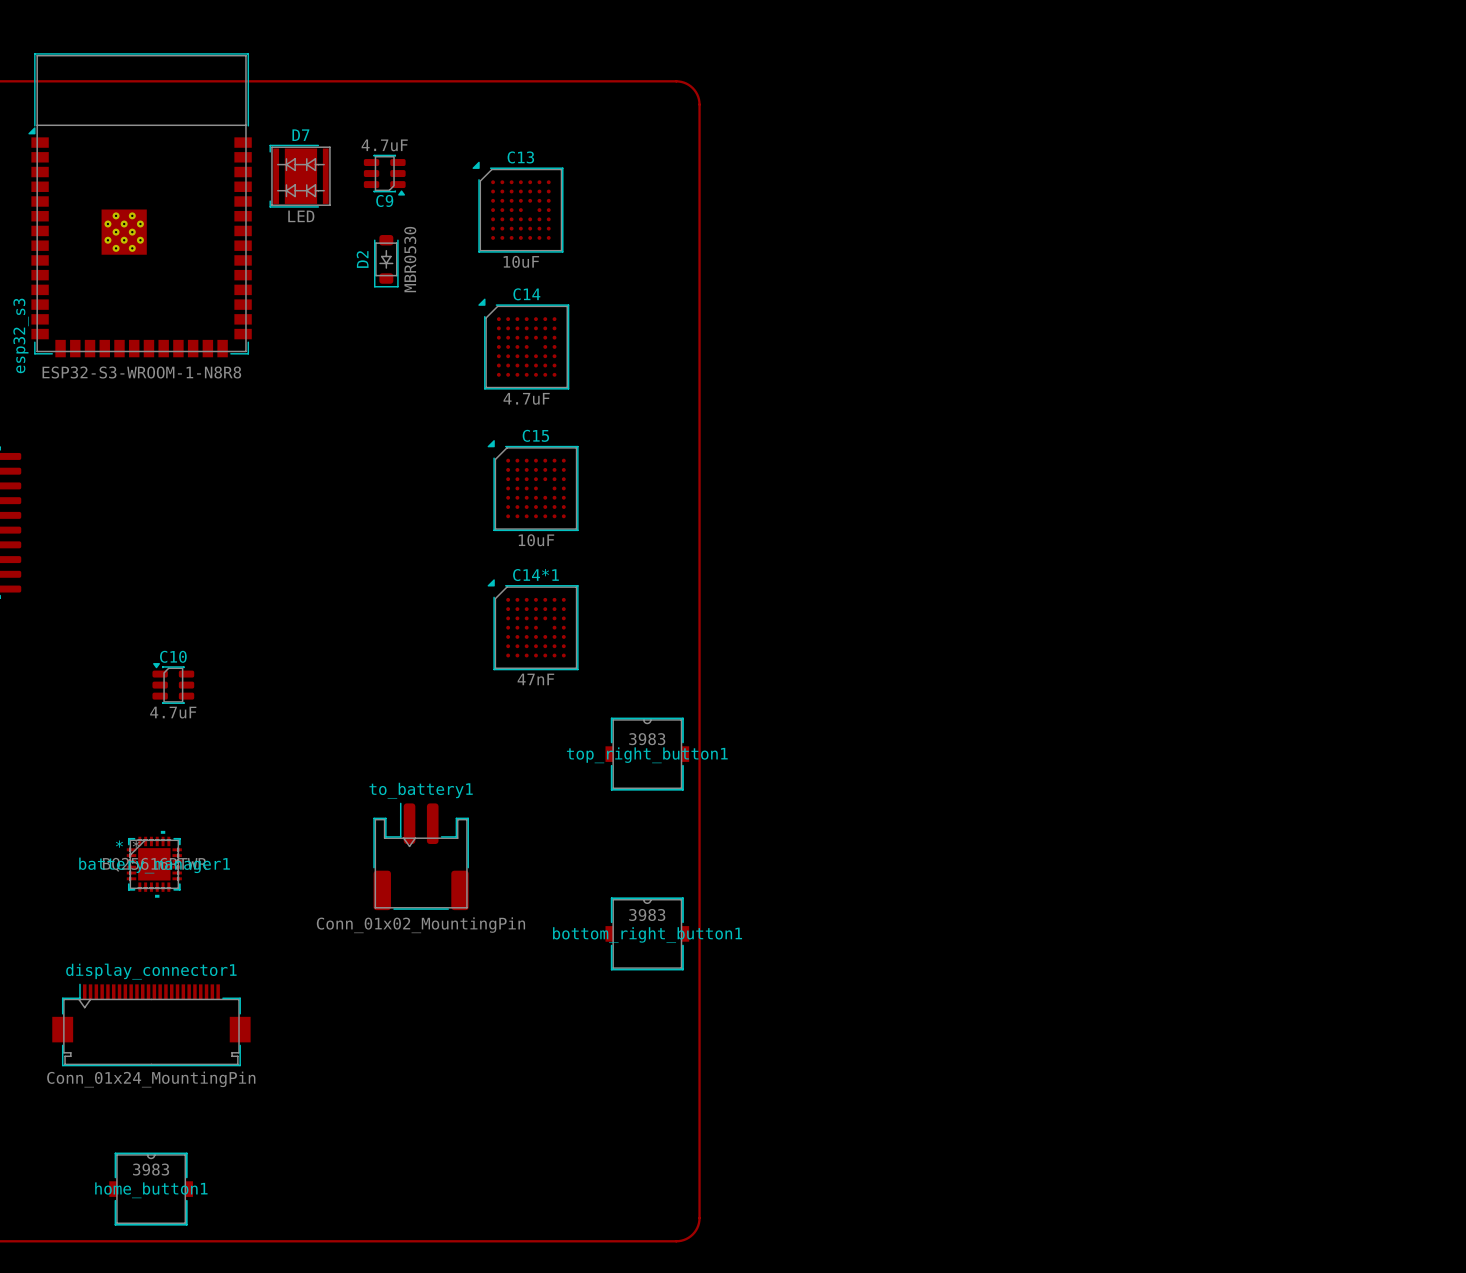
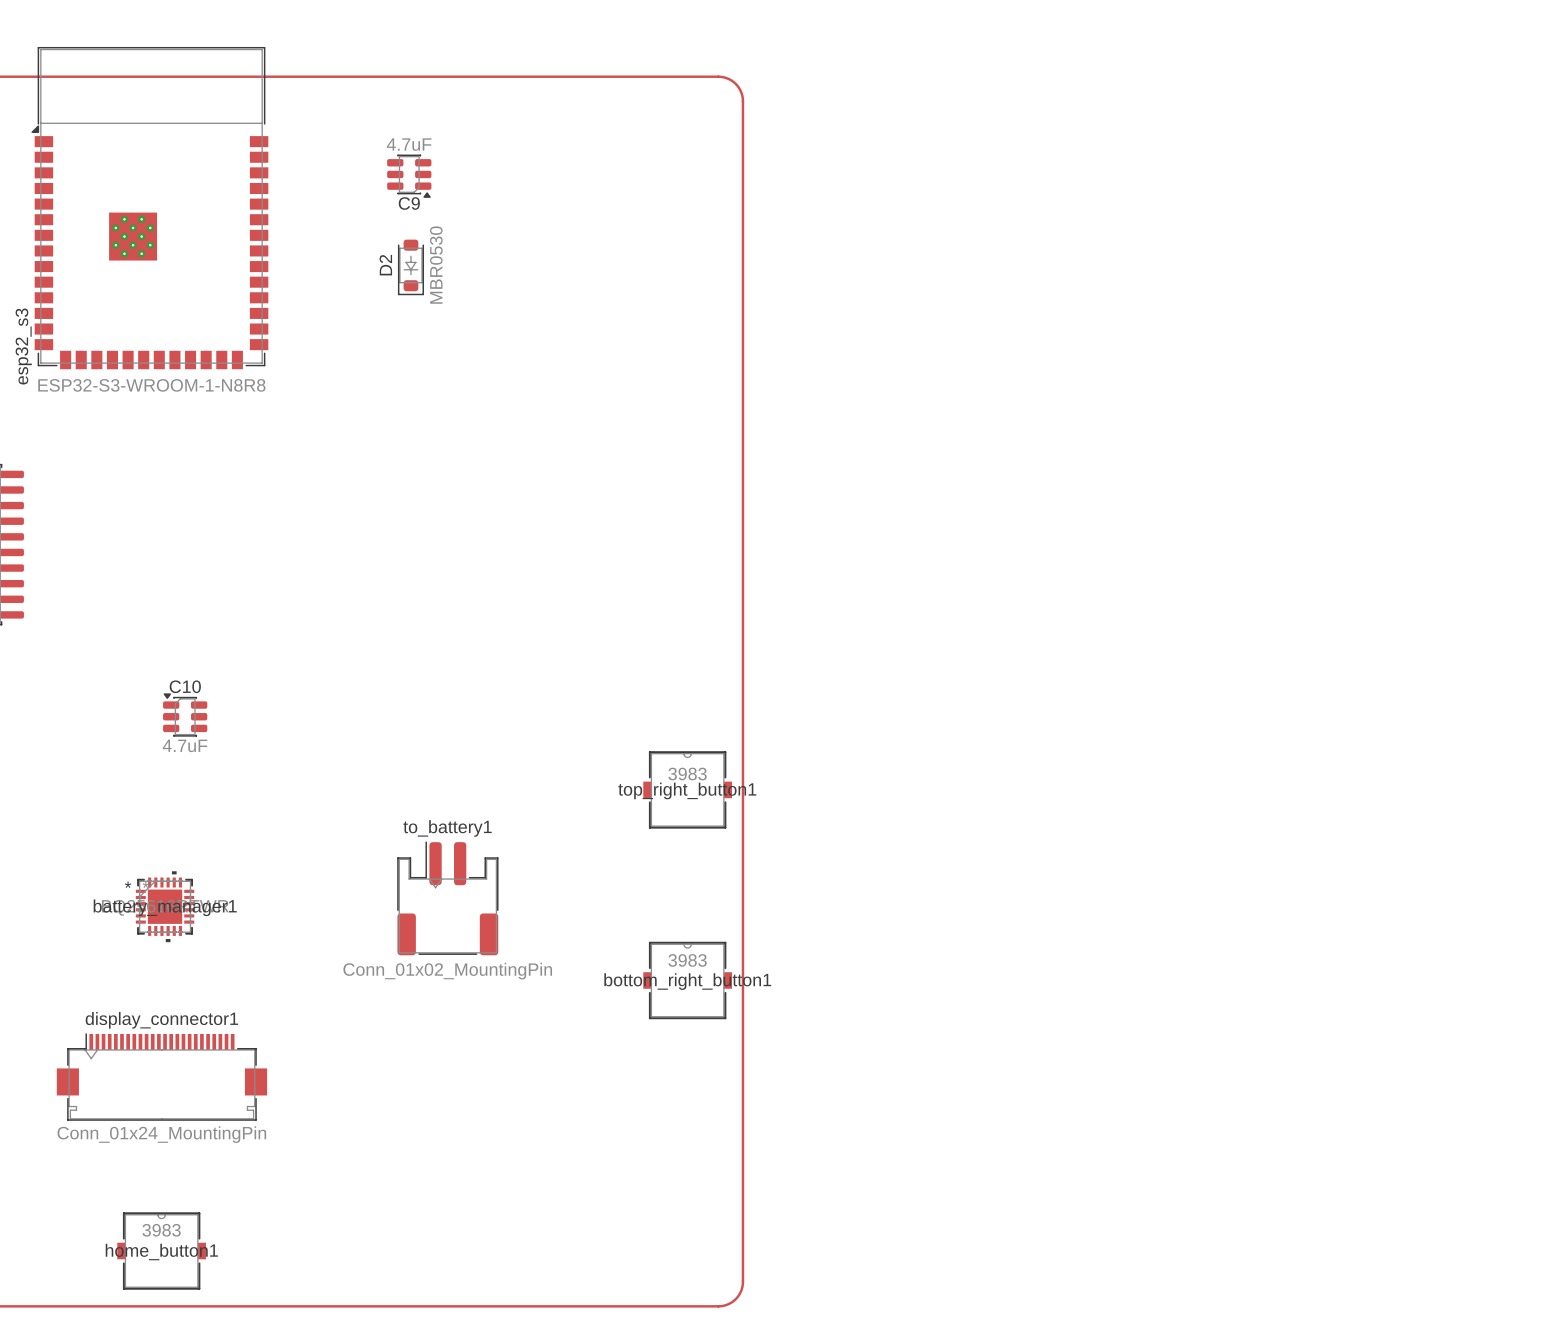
D7: LED (300, 176) -> none
C13: 10uF (517, 207) -> none
C14: 4.7uF (523, 344) -> none
C15: 10uF (533, 485) -> none
C14*1: 47nF (533, 624) -> none

